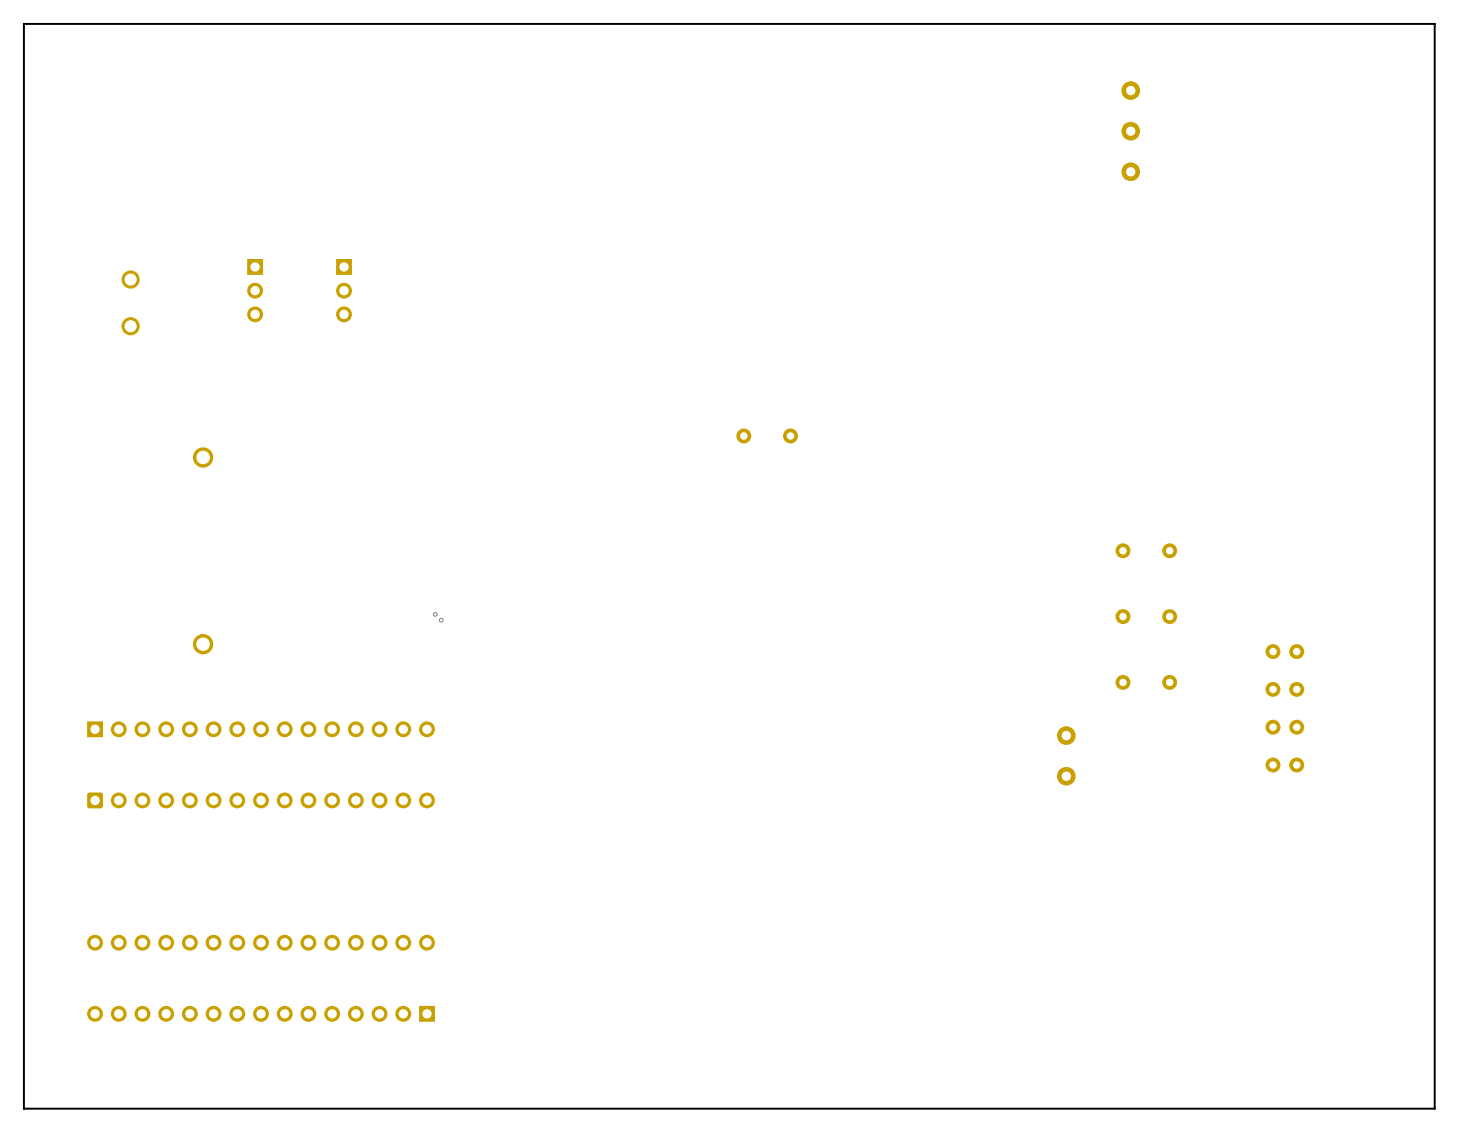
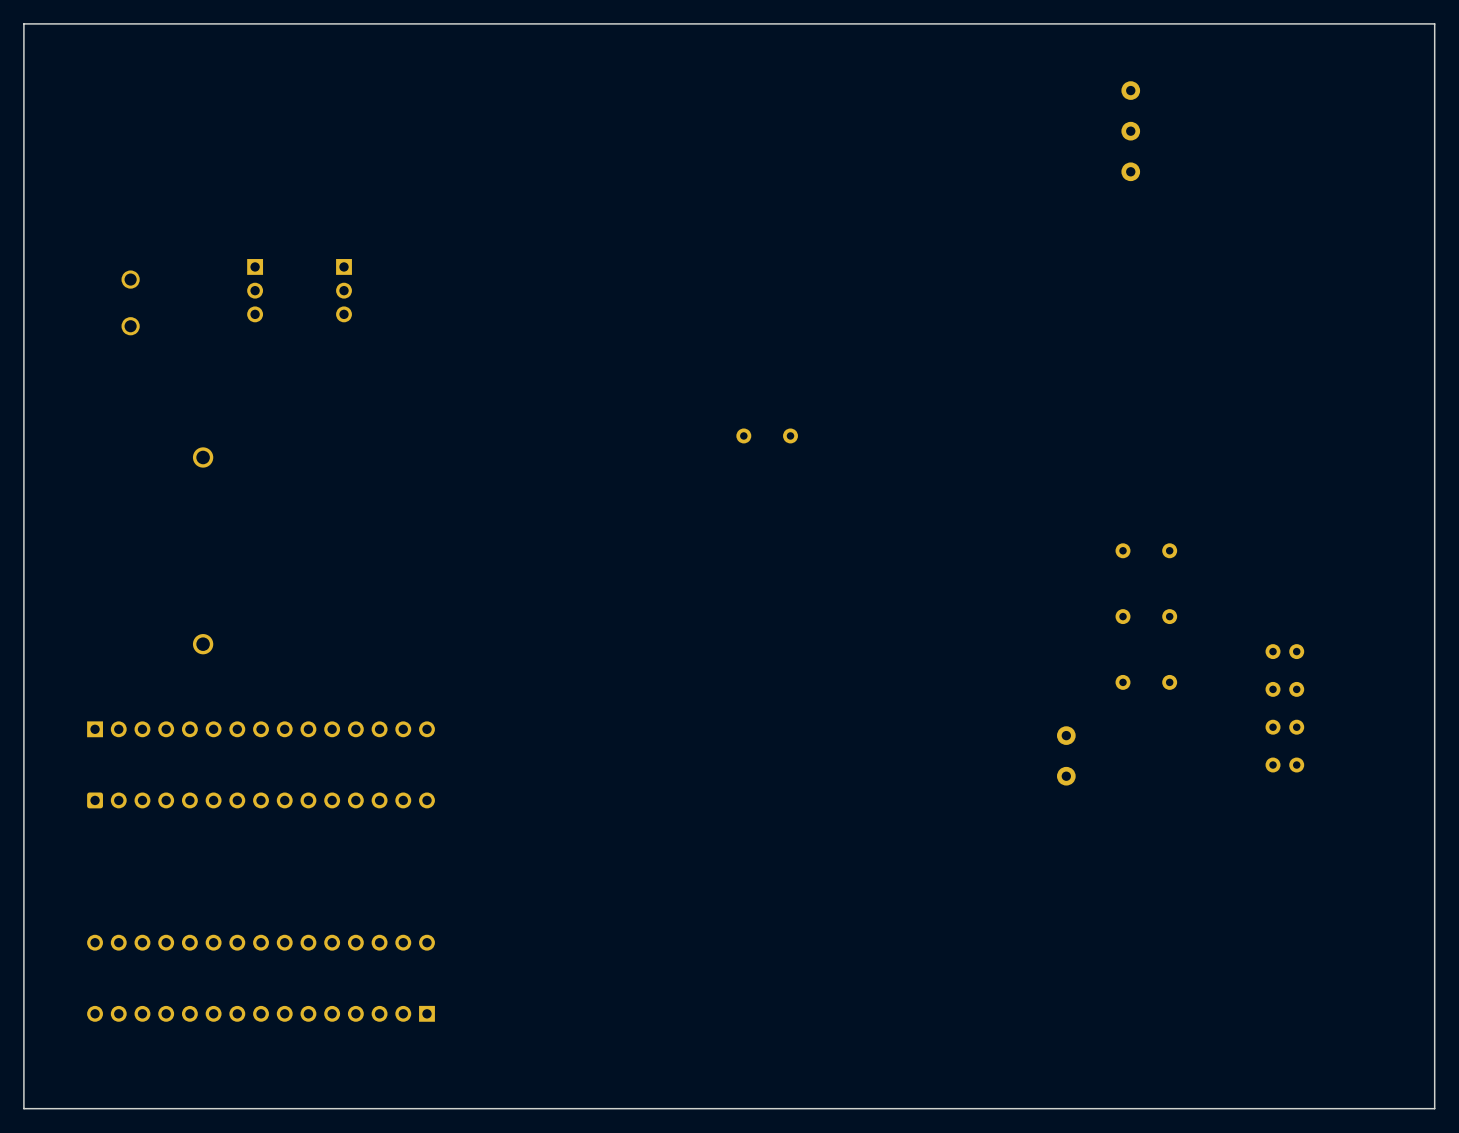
via: (435, 614) -> none
via: (441, 620) -> none

